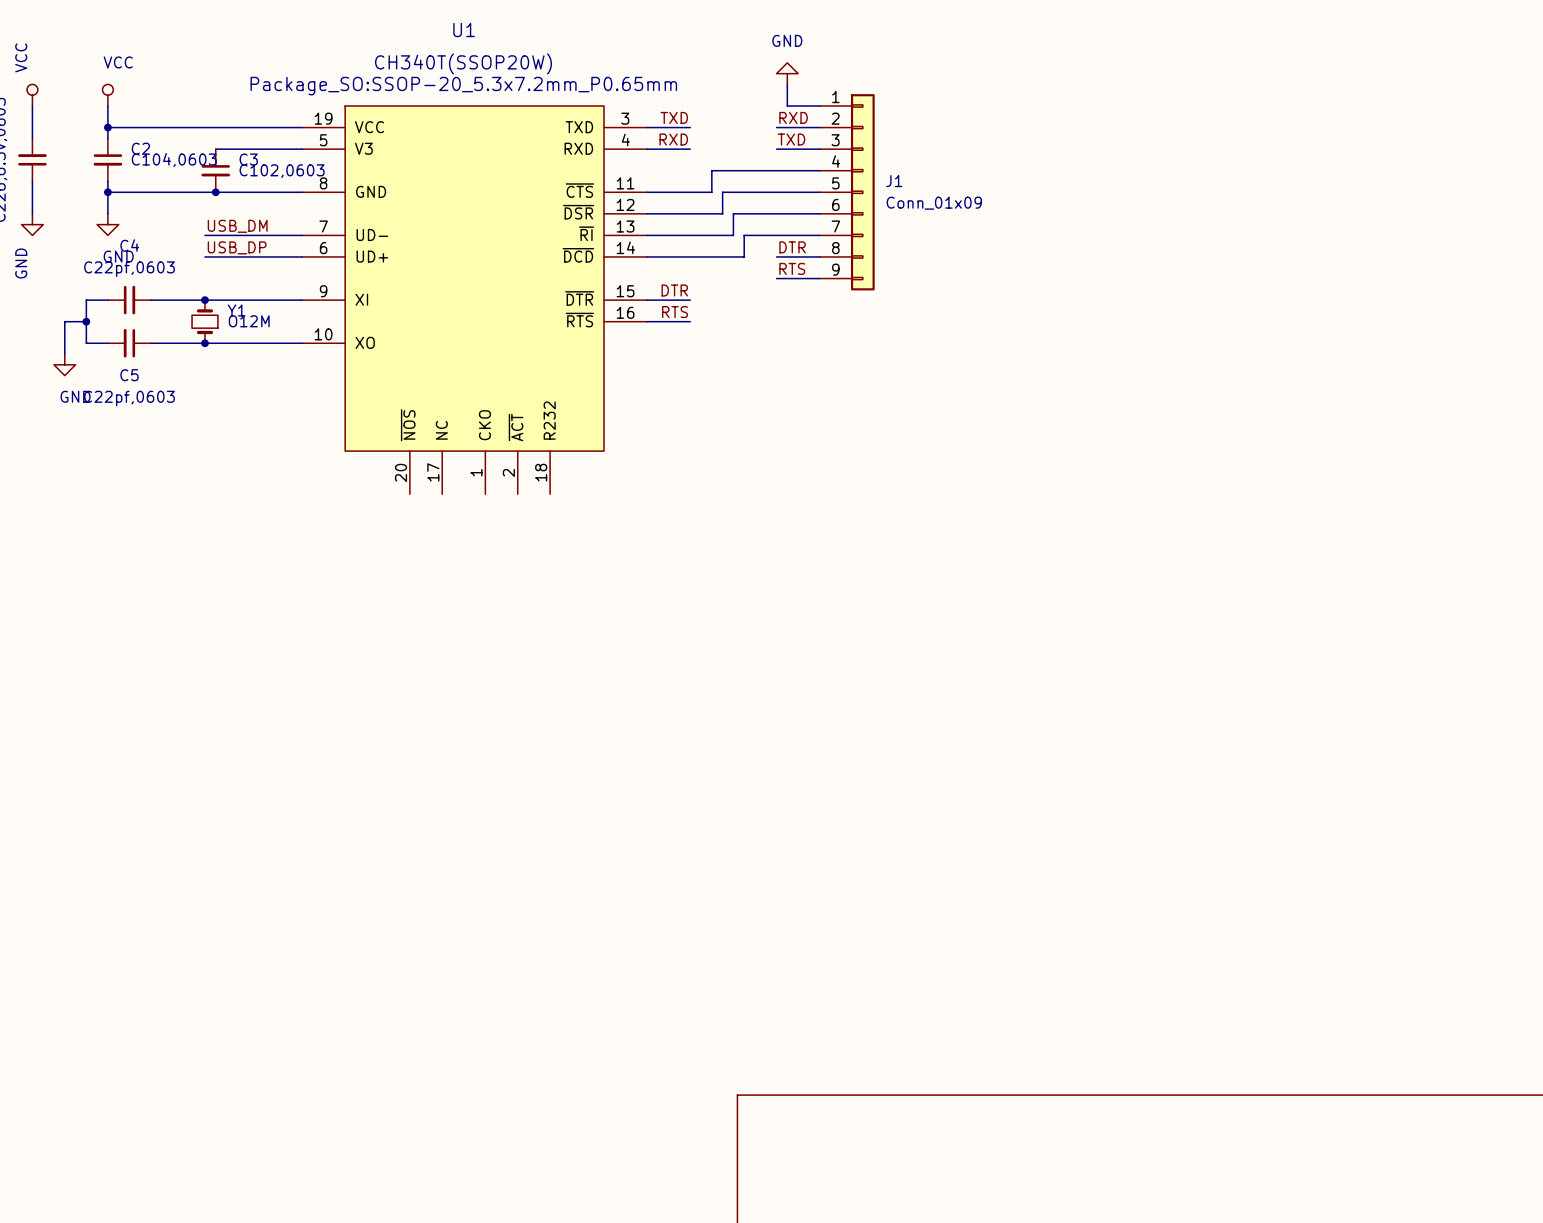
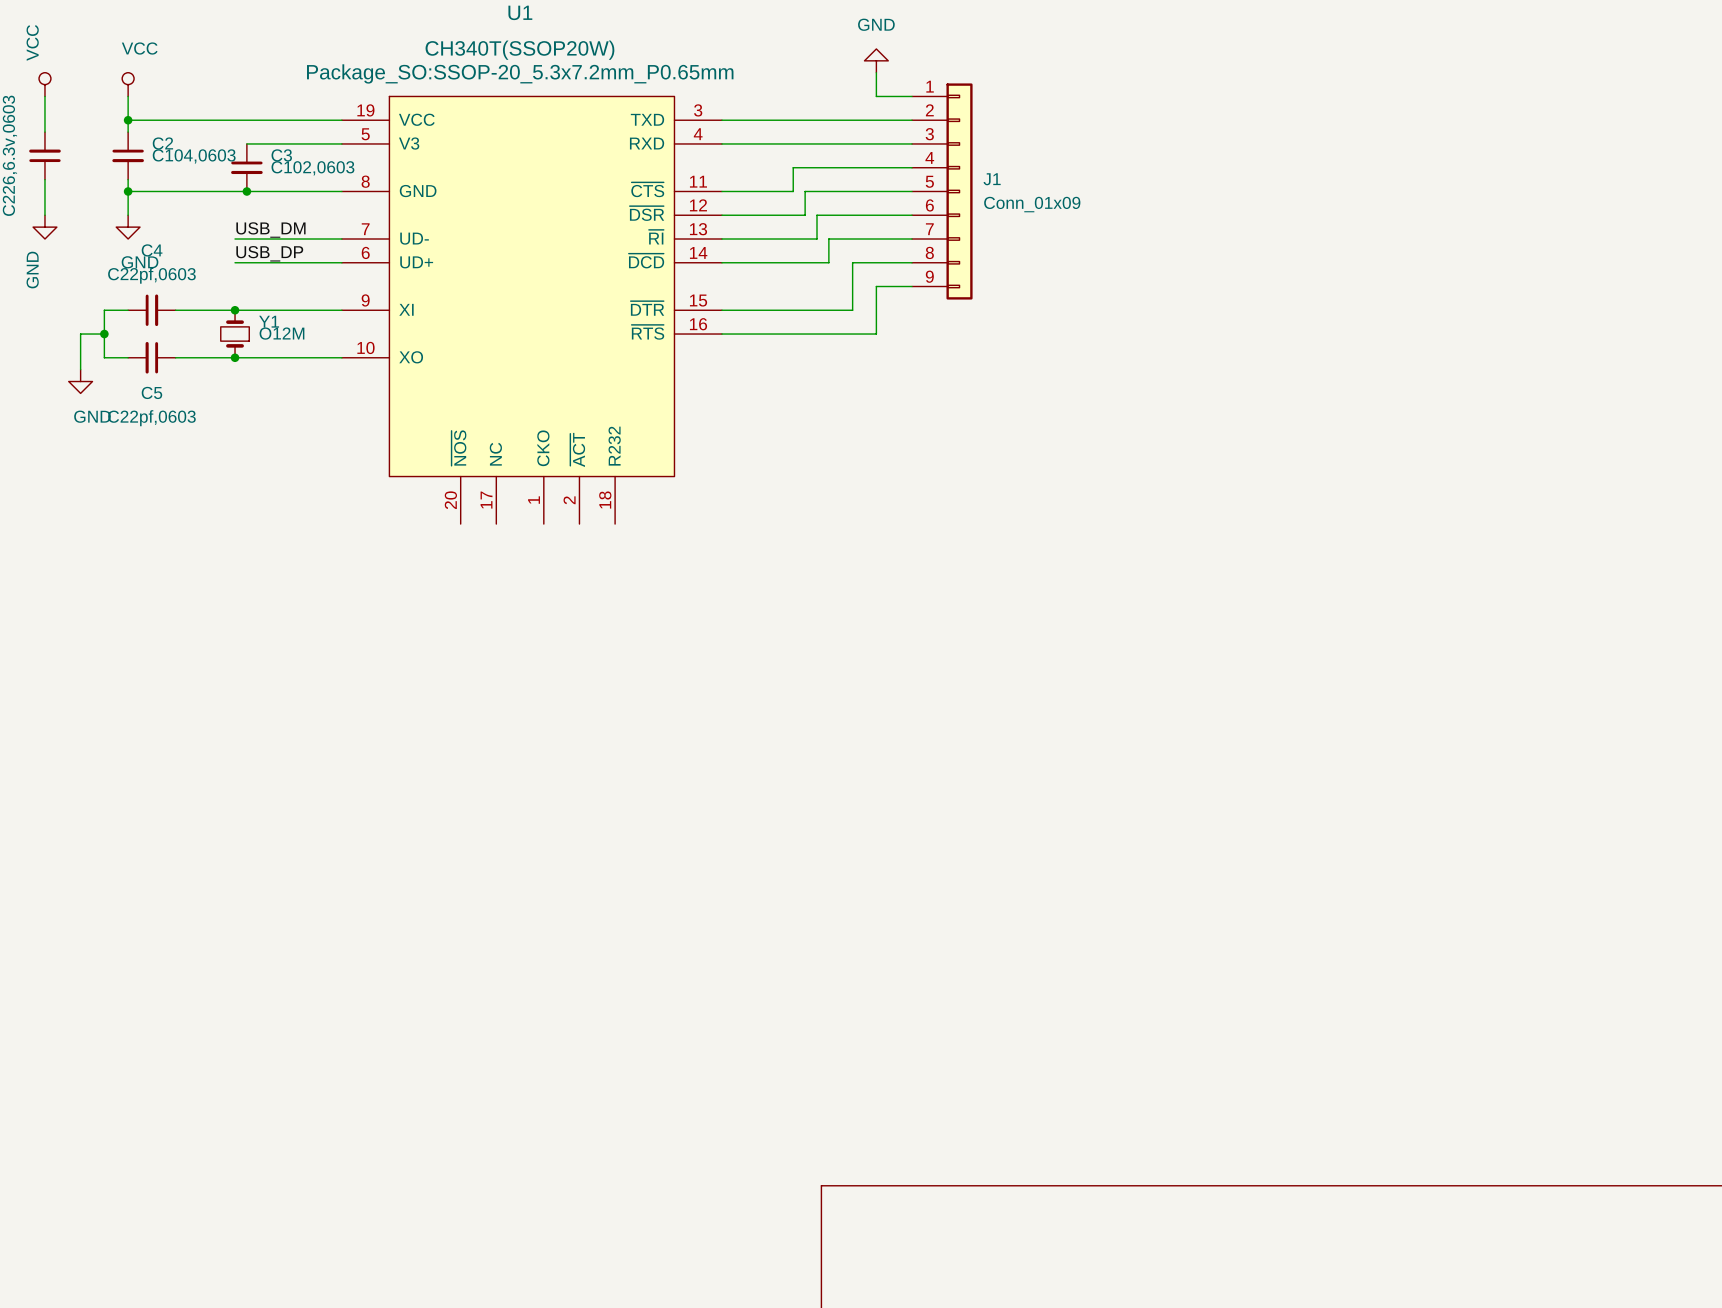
label: TXD (674, 117) -> none
label: RXD (793, 117) -> none
wire: none -> (769, 120) (864, 120)
label: RXD (673, 139) -> none
label: TXD (791, 139) -> none
wire: none -> (769, 143) (864, 143)
label: DTR (792, 247) -> none
wire: none -> (864, 262) (852, 262) (852, 310) (769, 310)
label: RTS (792, 268) -> none
wire: (776, 278) (787, 278) -> (769, 334) (876, 334) (876, 286)
label: DTR (674, 290) -> none
label: RTS (675, 312) -> none

